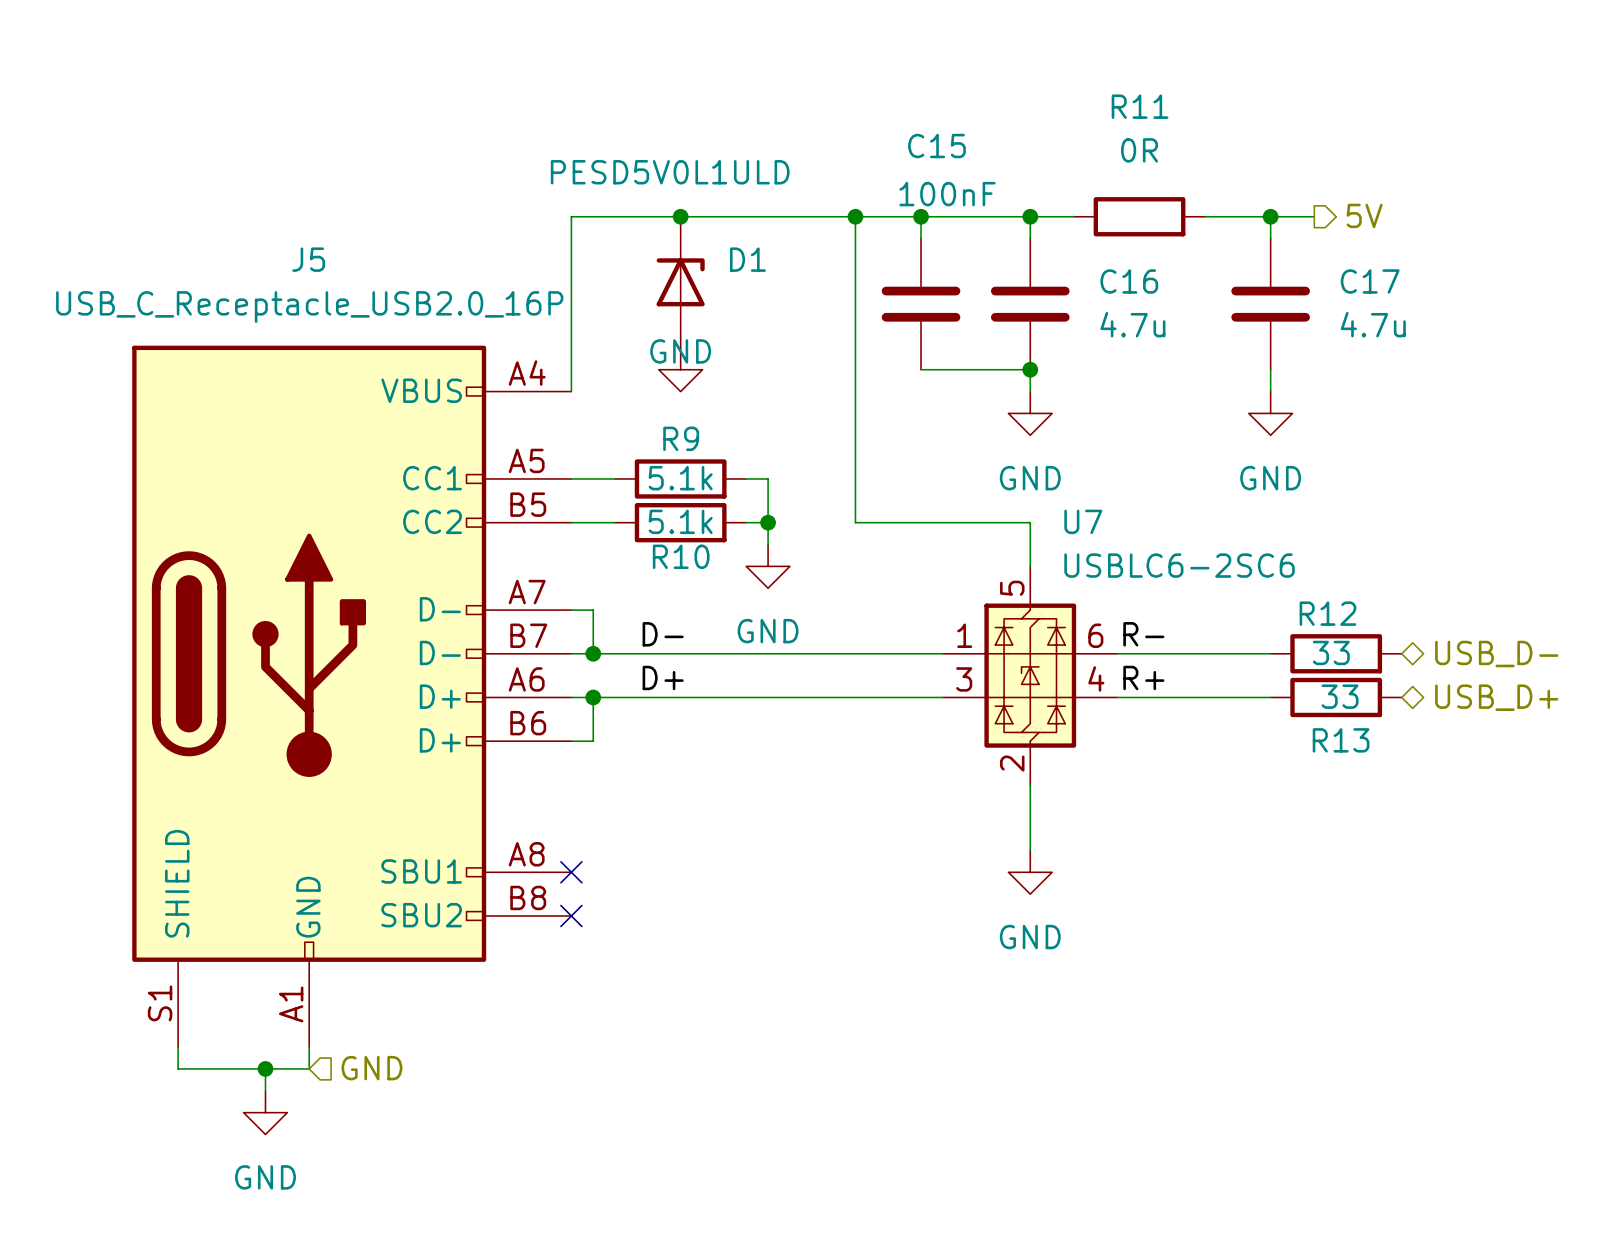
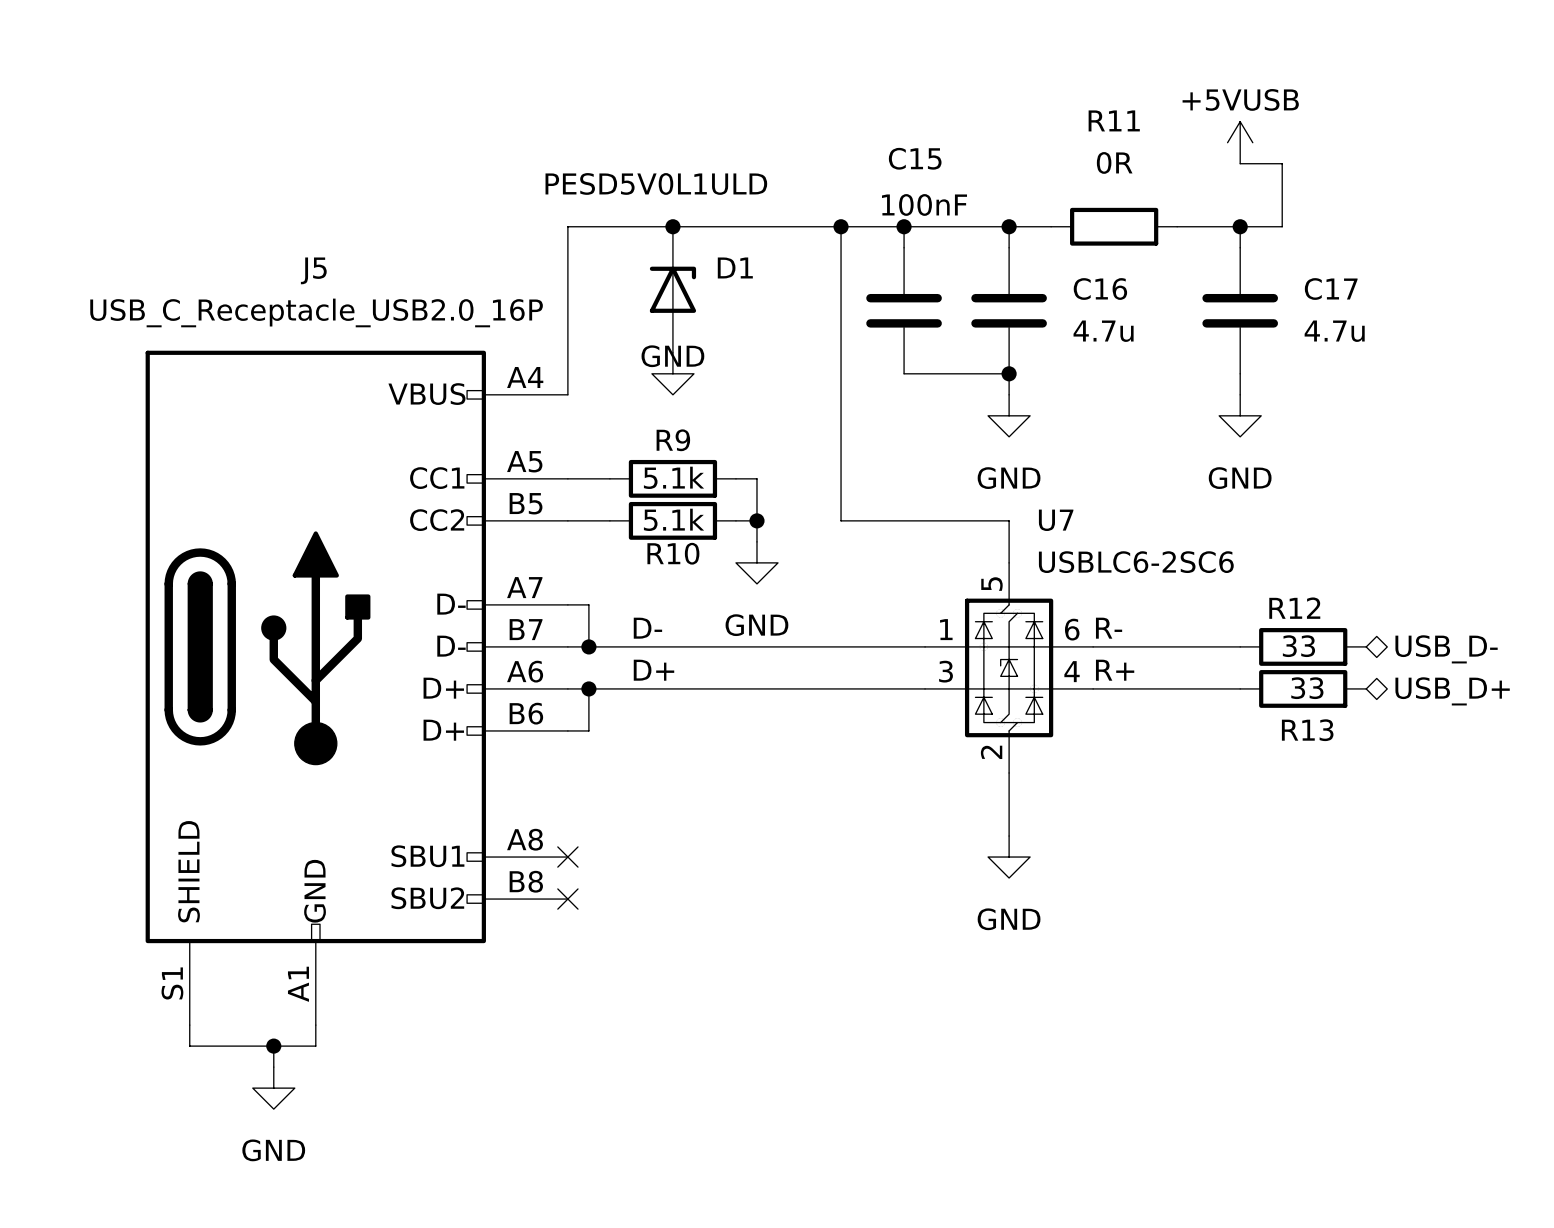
power symbol: none -> +5VUSB (1240, 142)
wire: none -> (1240, 163) (1282, 163) (1282, 226)
hierarchical label: 5V (1364, 215) -> none
hierarchical label: GND (371, 1068) -> none

